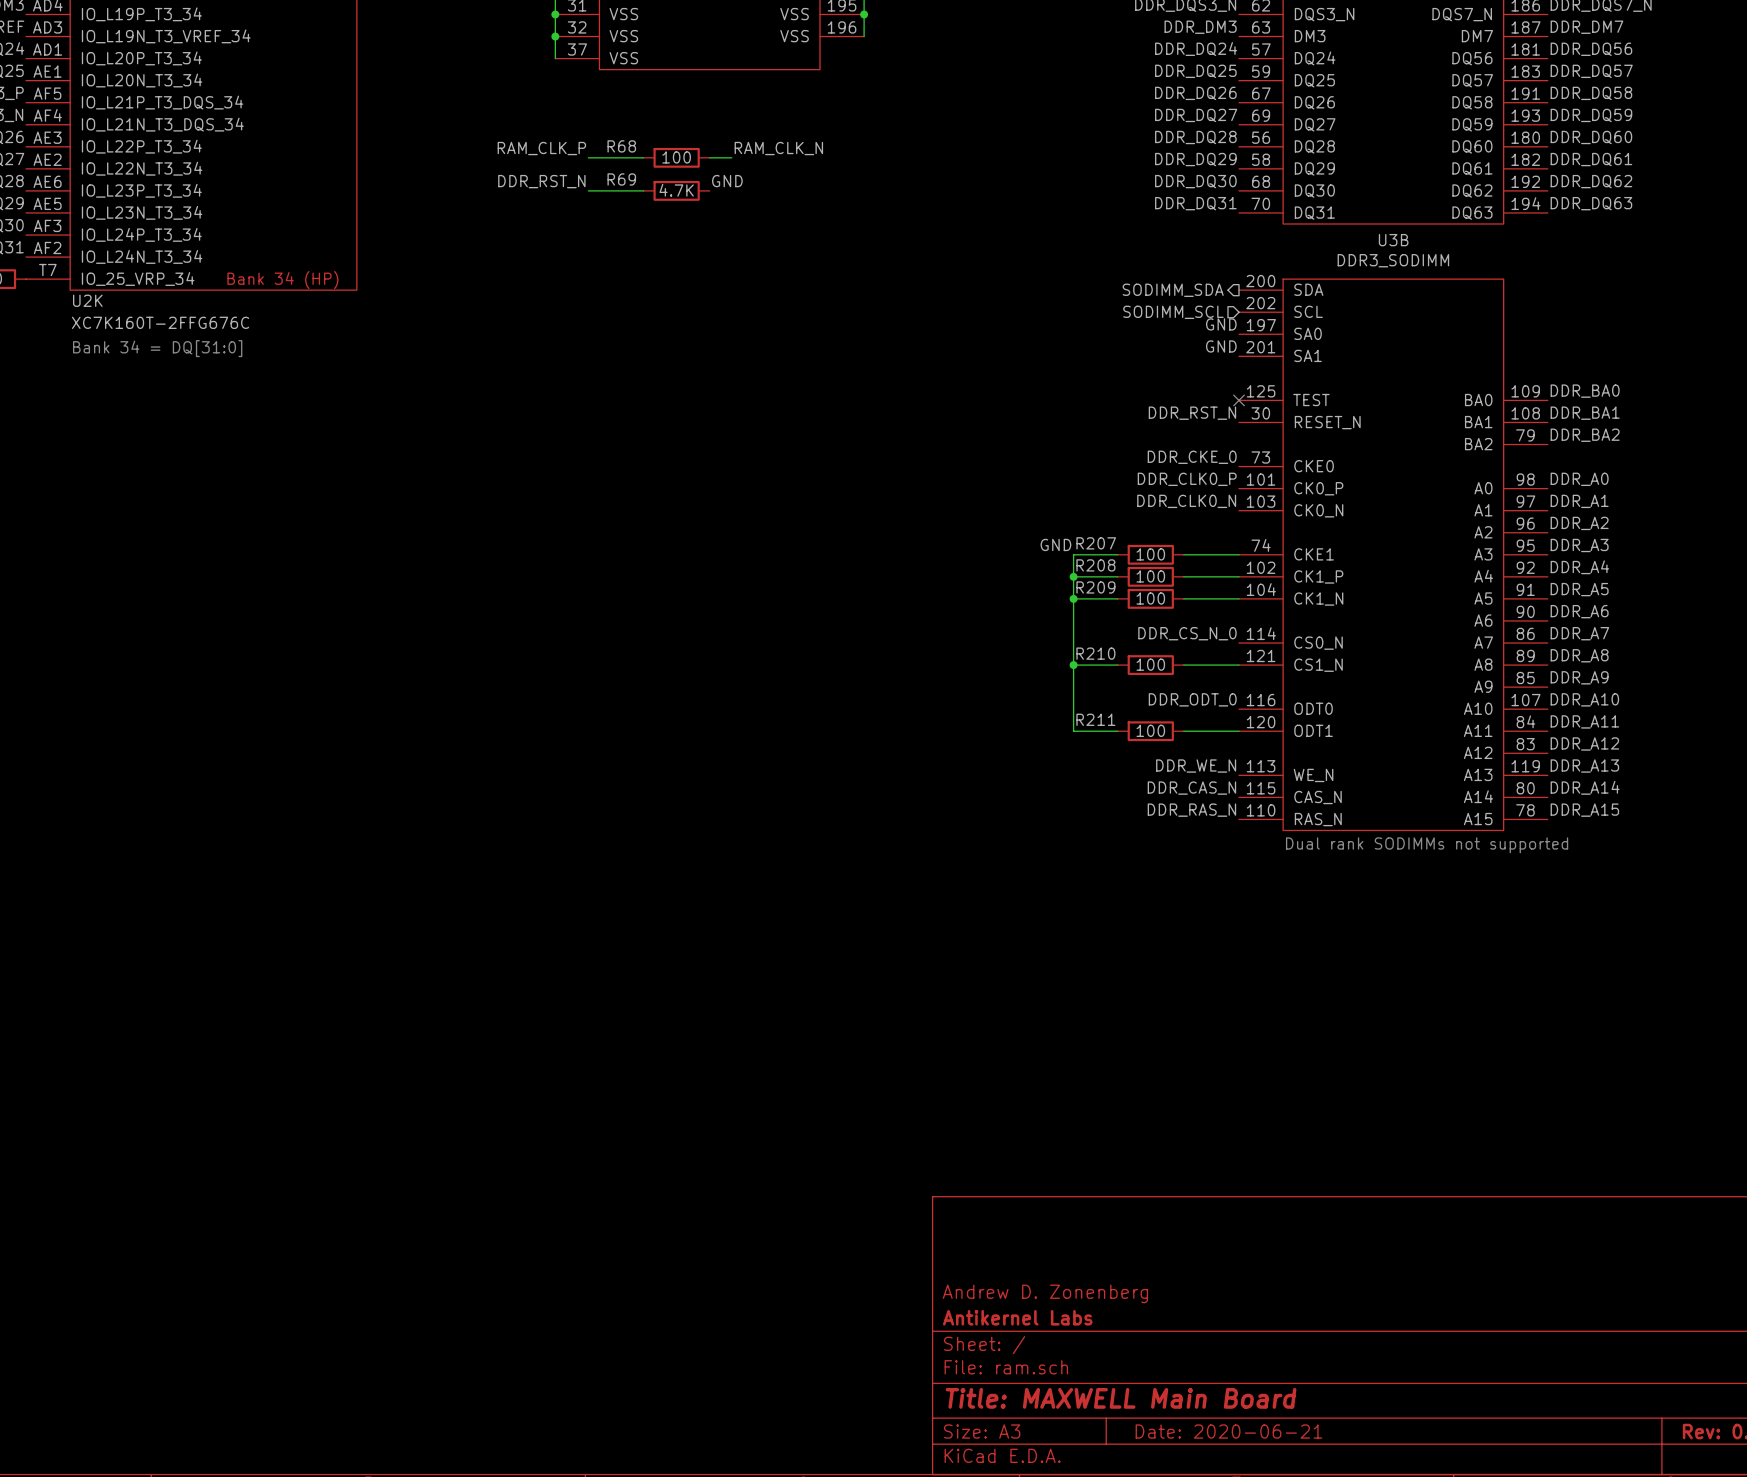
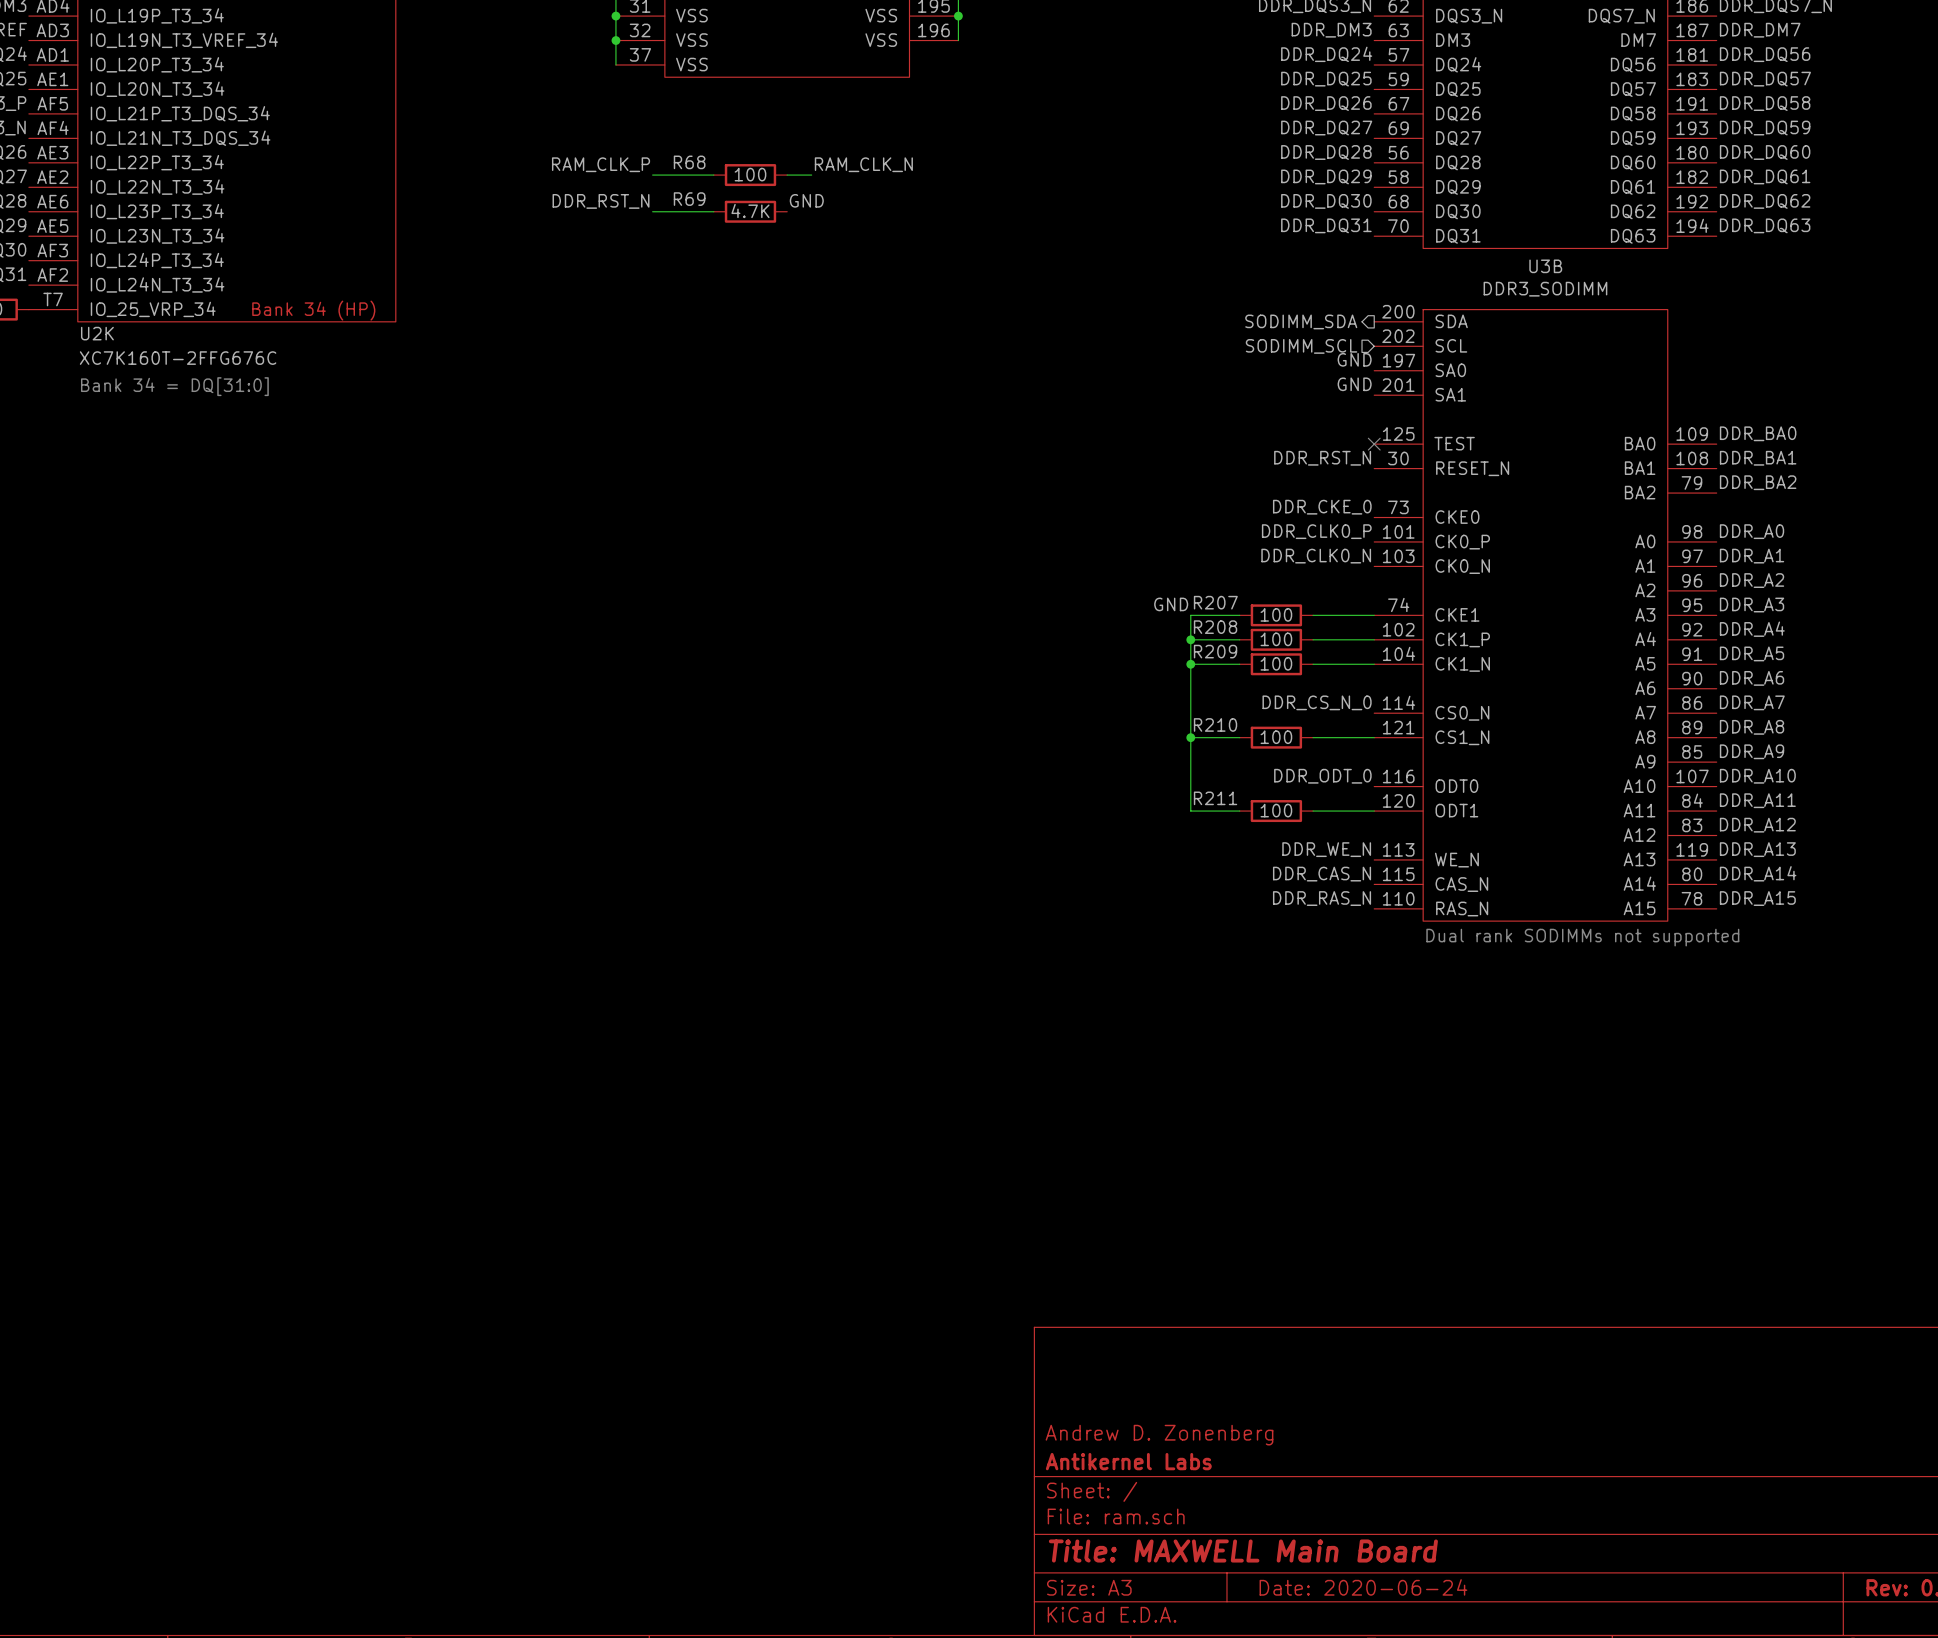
title block: Date: 2020-06-21 (1228, 1431) -> Date: 2020-06-24 (1363, 1587)

